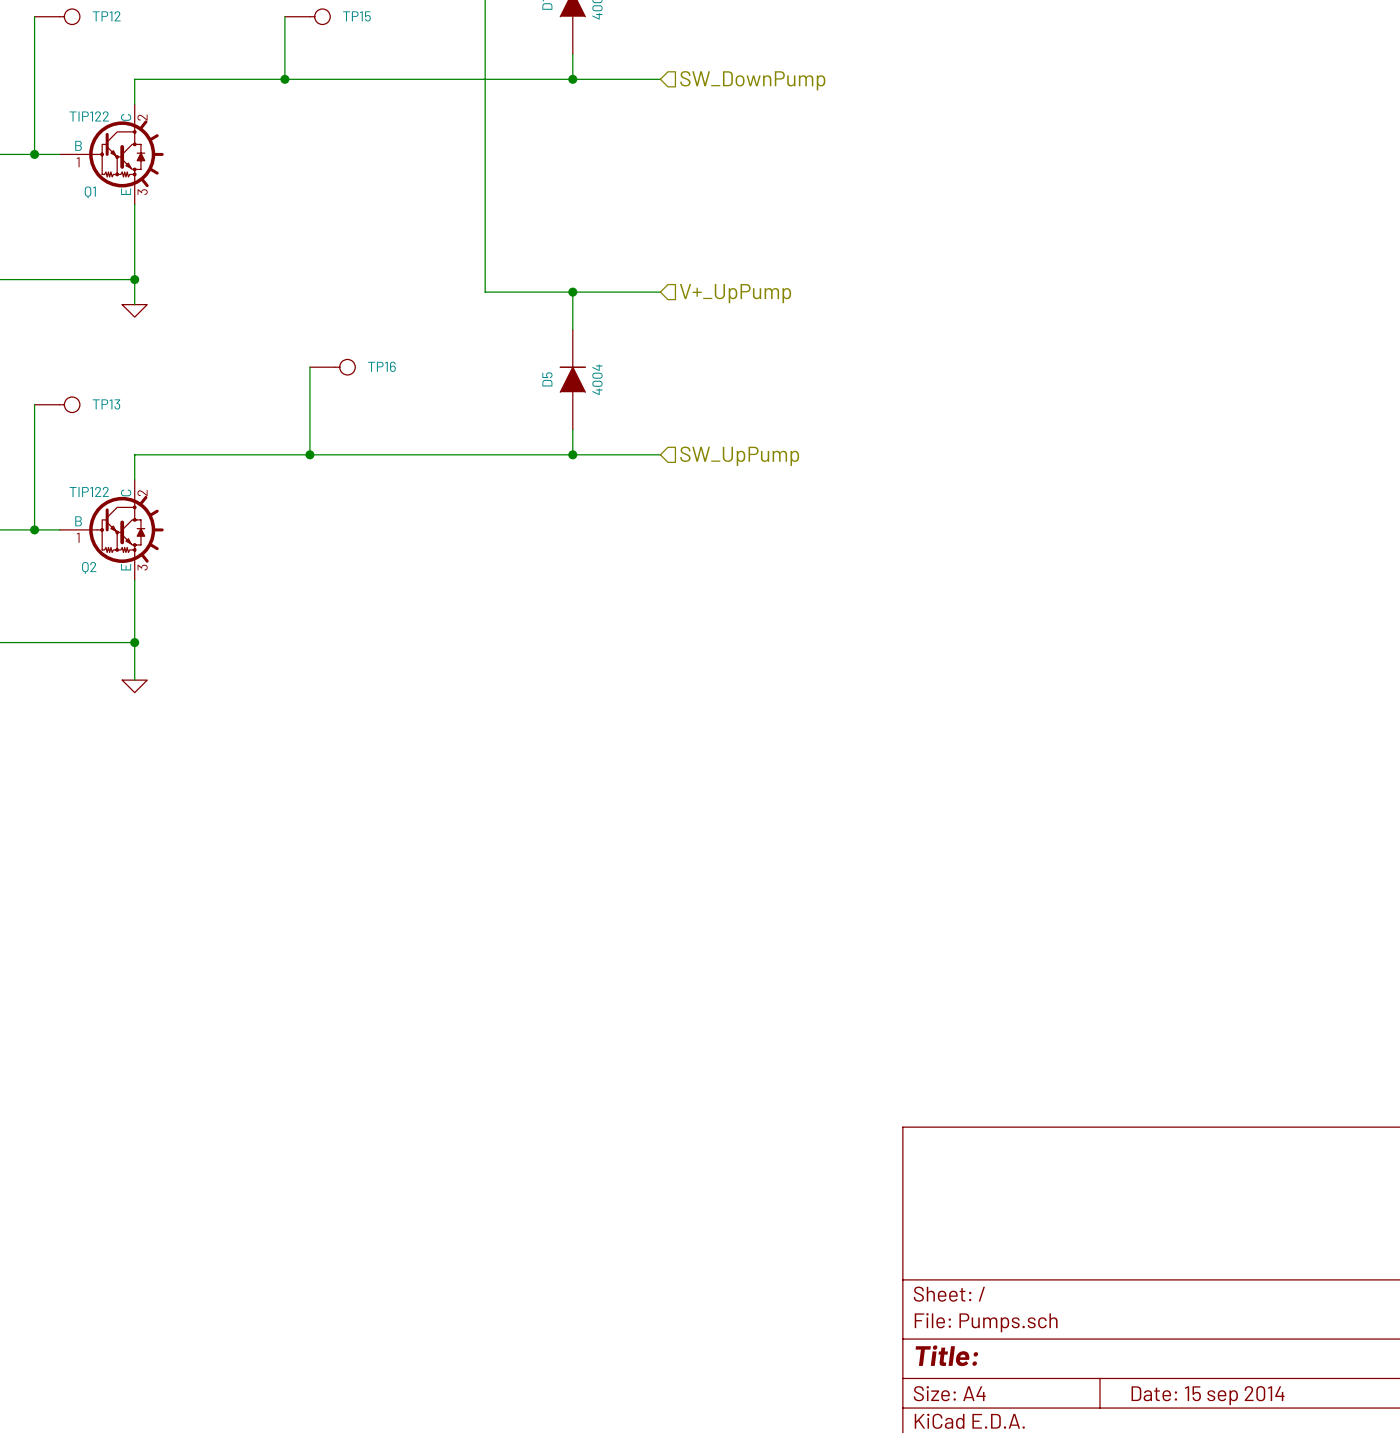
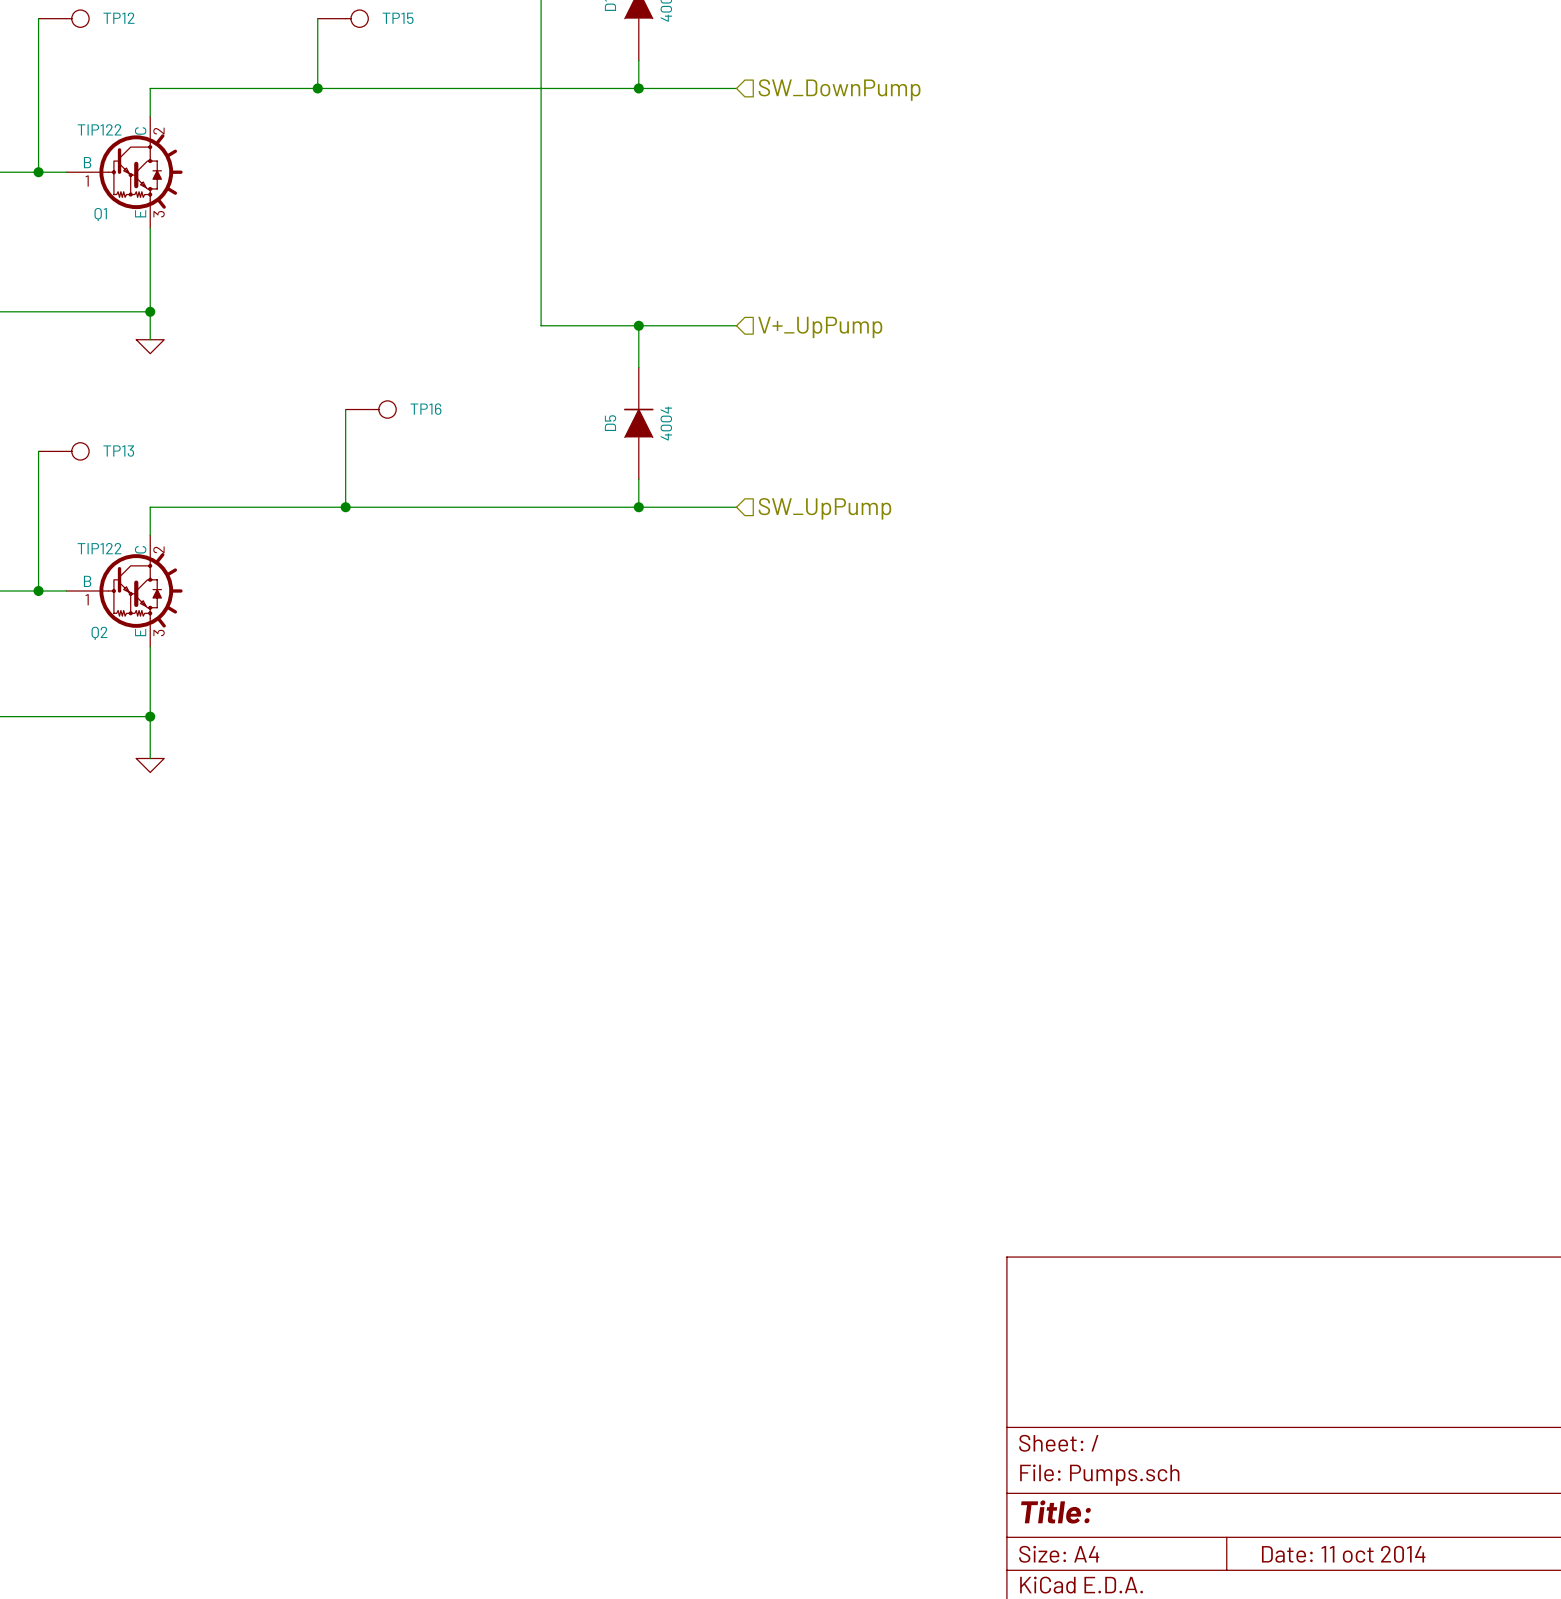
title block: Date: 15 sep 2014 (1208, 1395) -> Date: 11 oct 2014 (1343, 1554)

